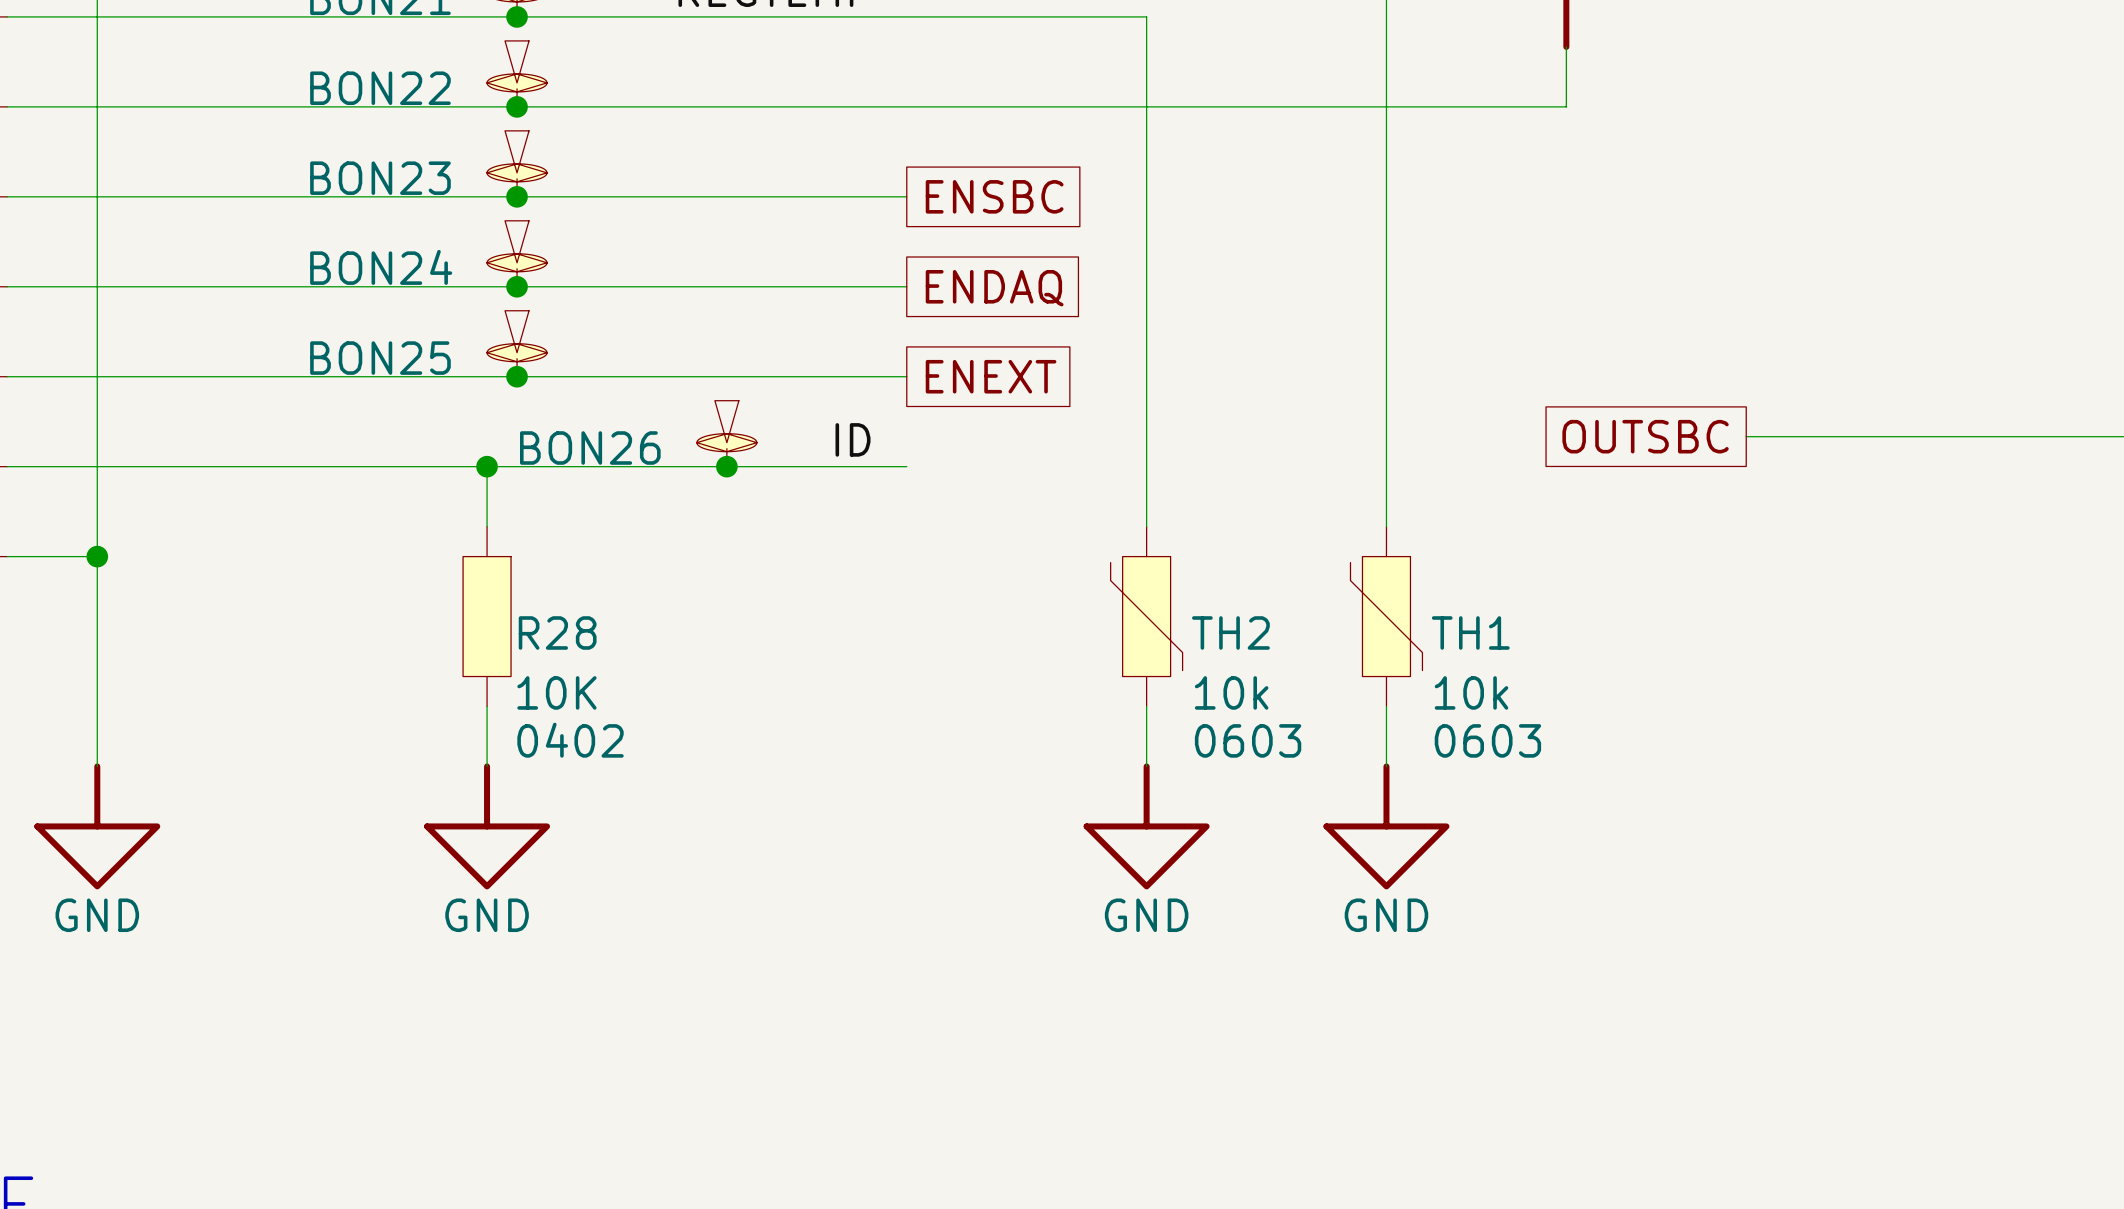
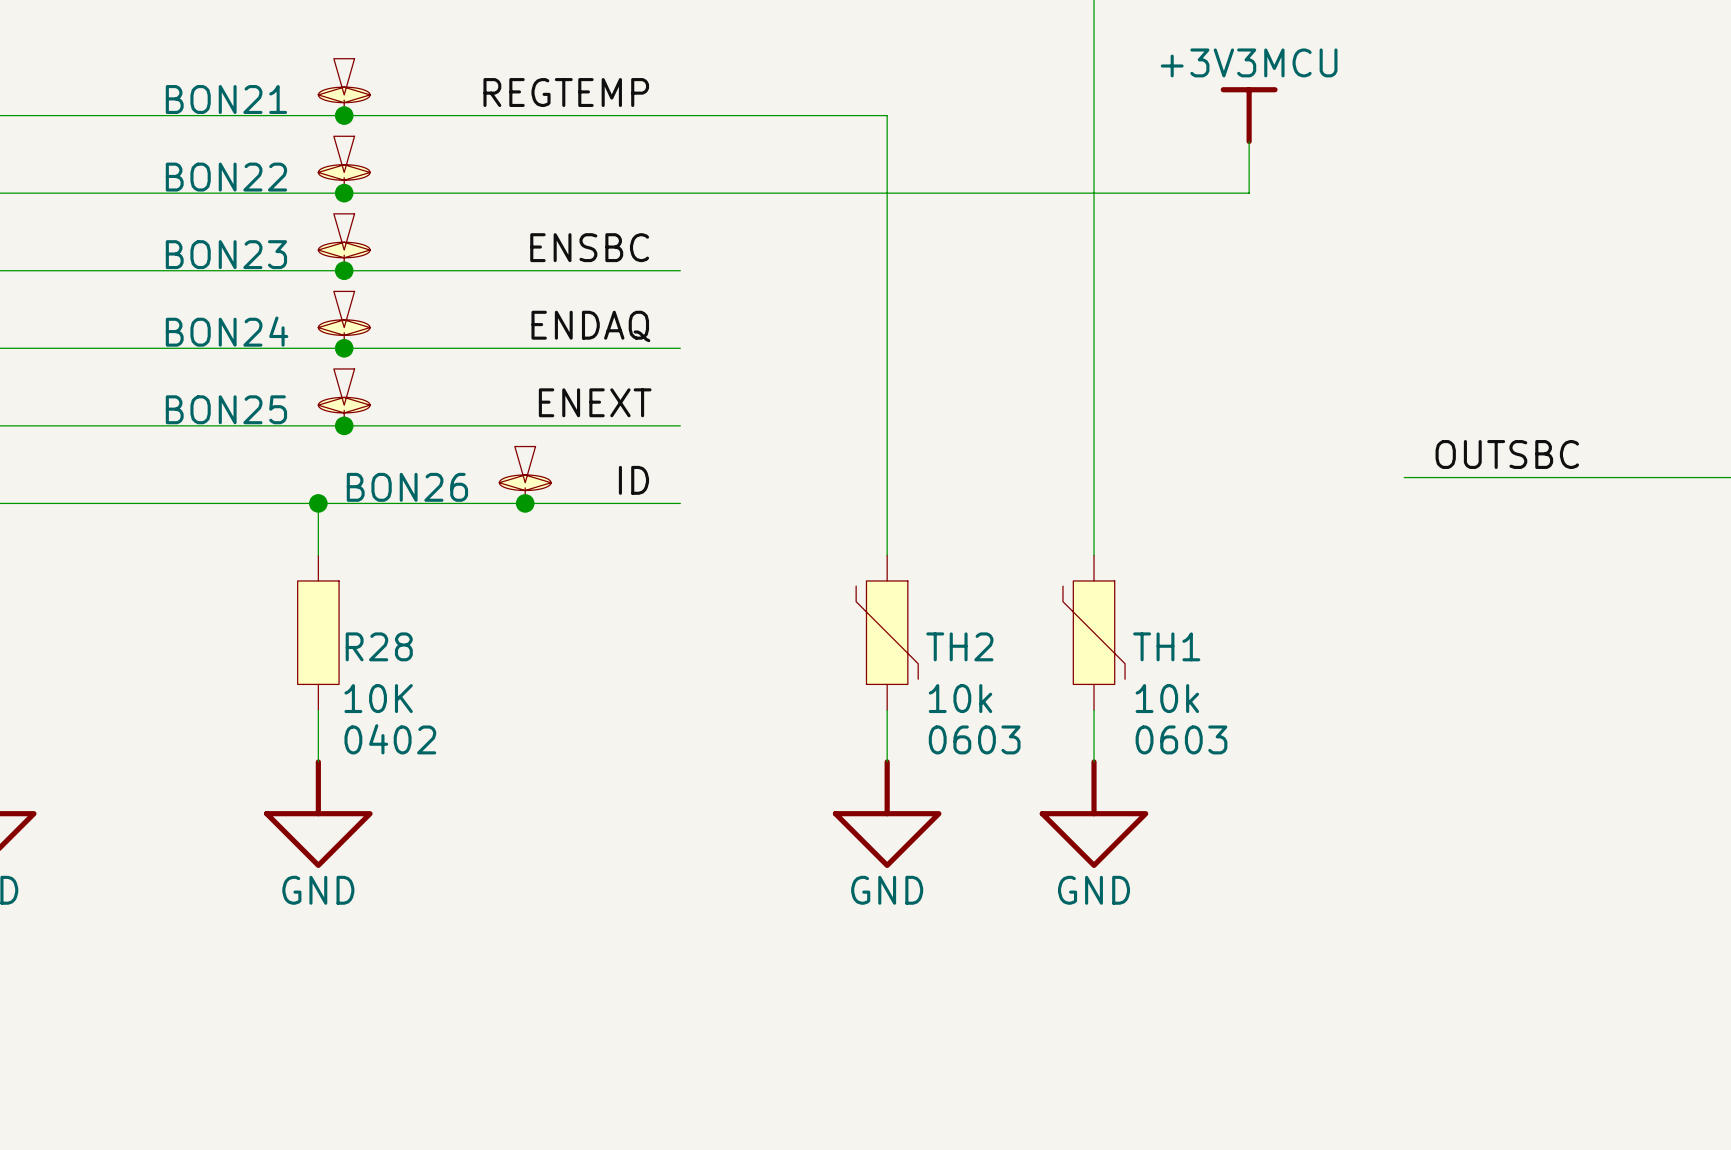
label: none -> ENSBC (589, 247)
global label: ENSBC (994, 196) -> none
label: none -> ENDAQ (590, 326)
global label: ENDAQ (994, 288) -> none
label: none -> ENEXT (595, 402)
global label: ENEXT (991, 376) -> none
label: none -> OUTSBC (1507, 454)
global label: OUTSBC (1645, 436) -> none

